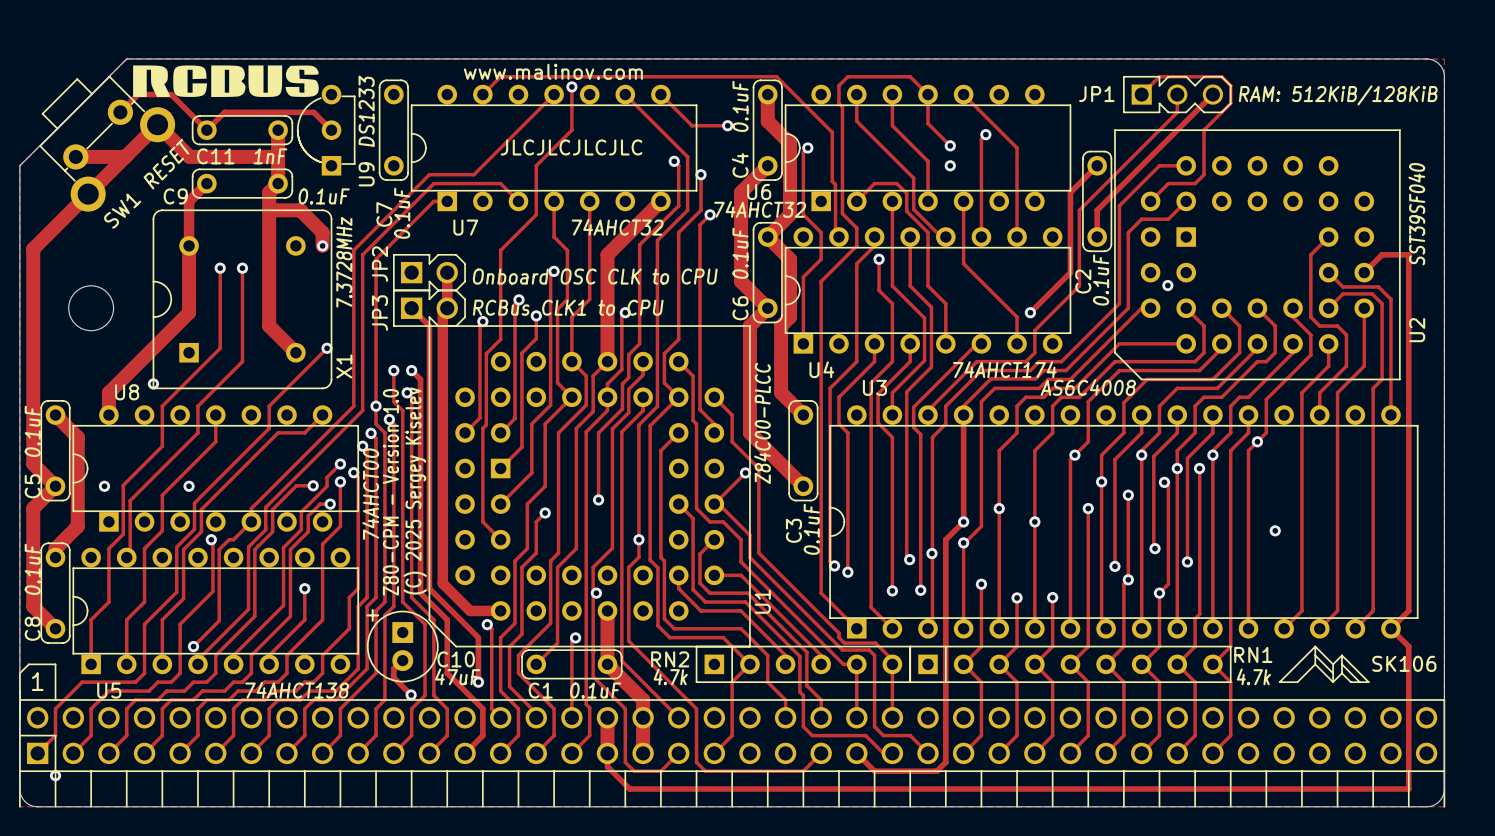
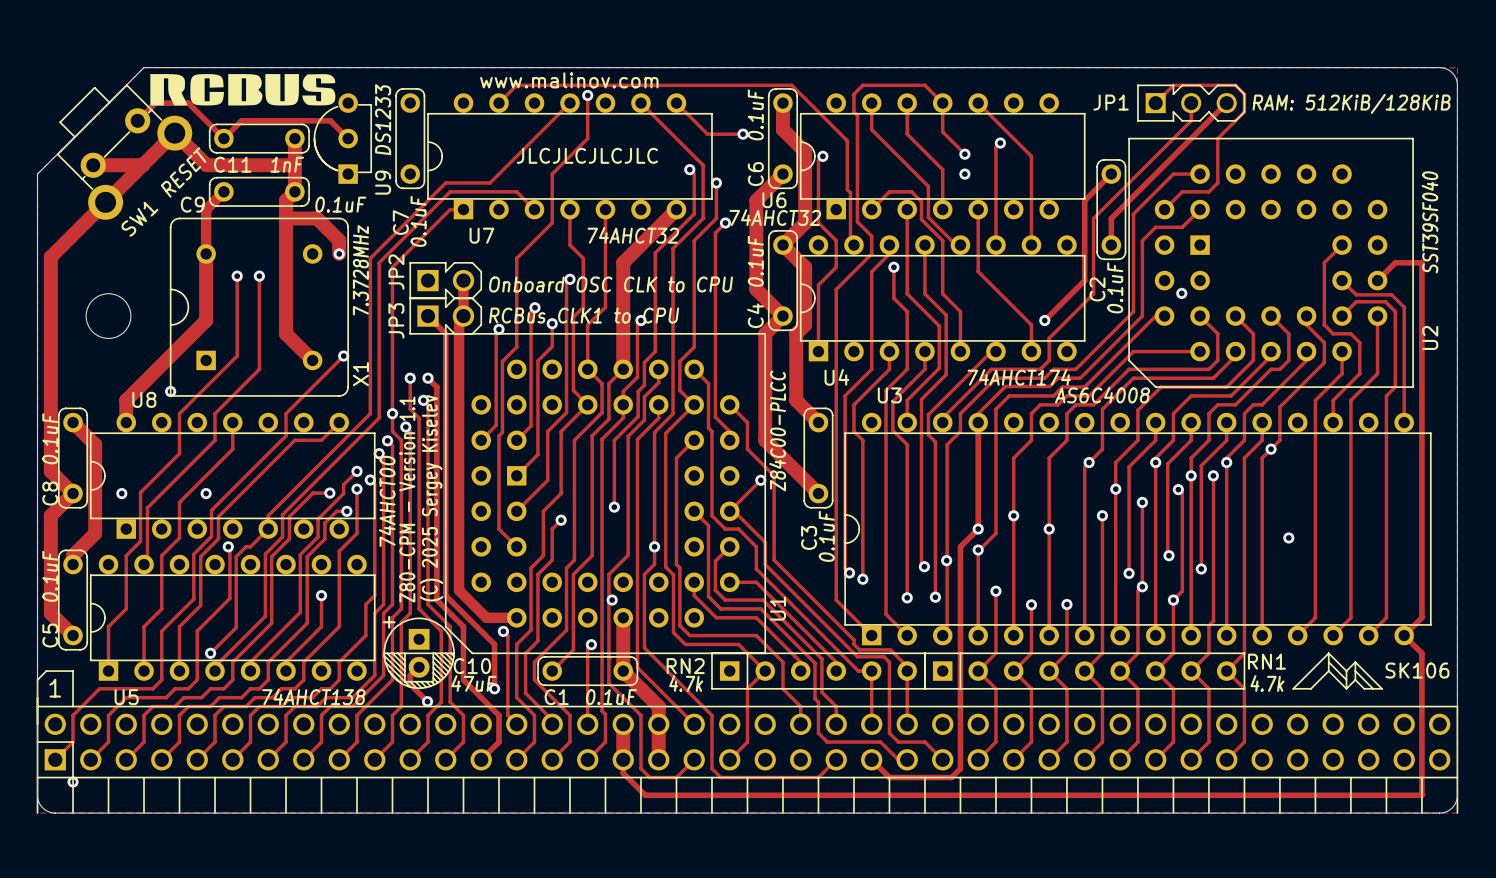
C4 name: C4 (740, 165) -> C6 (755, 174)
C6 name: C6 (740, 308) -> C4 (755, 315)
C5 name: C5 (32, 486) -> C8 (50, 493)
text: Z80-CPM - Version 1.0 (390, 492) -> Z80-CPM - Version 1.1 (407, 499)
C10 footprint: [366, 610, 439, 683] -> [383, 617, 455, 690]
C8 name: C8 (32, 628) -> C5 (50, 635)

